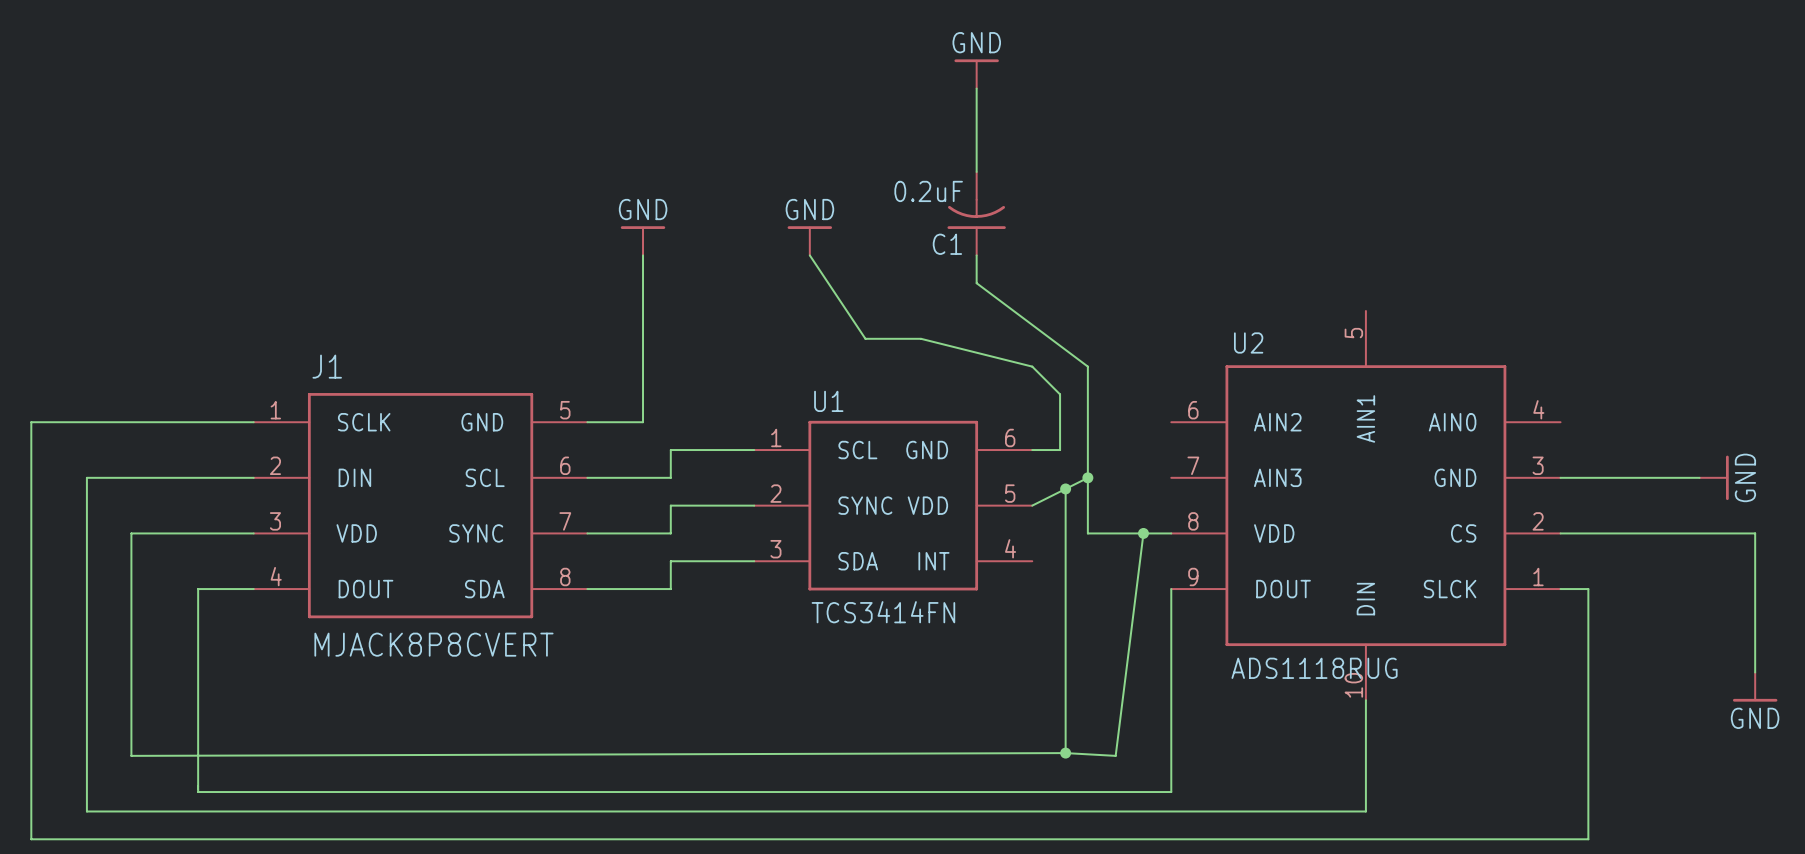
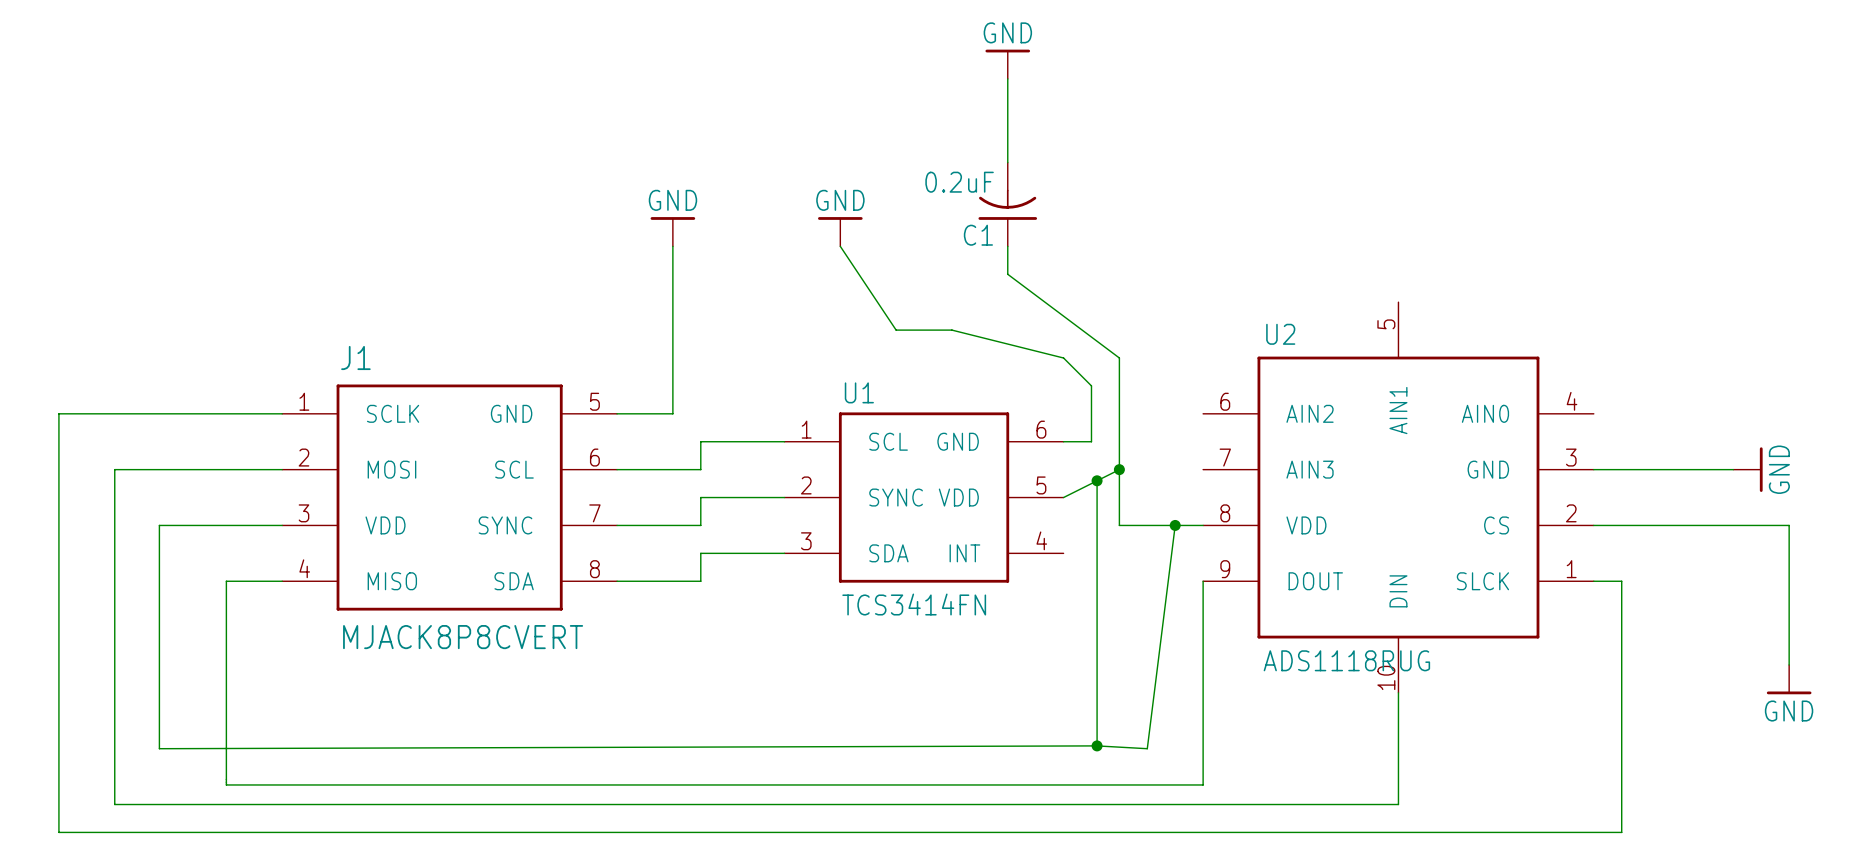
J1 pin name: DIN (354, 477) -> MOSI (391, 469)
J1 pin name: DOUT (365, 589) -> MISO (392, 581)

